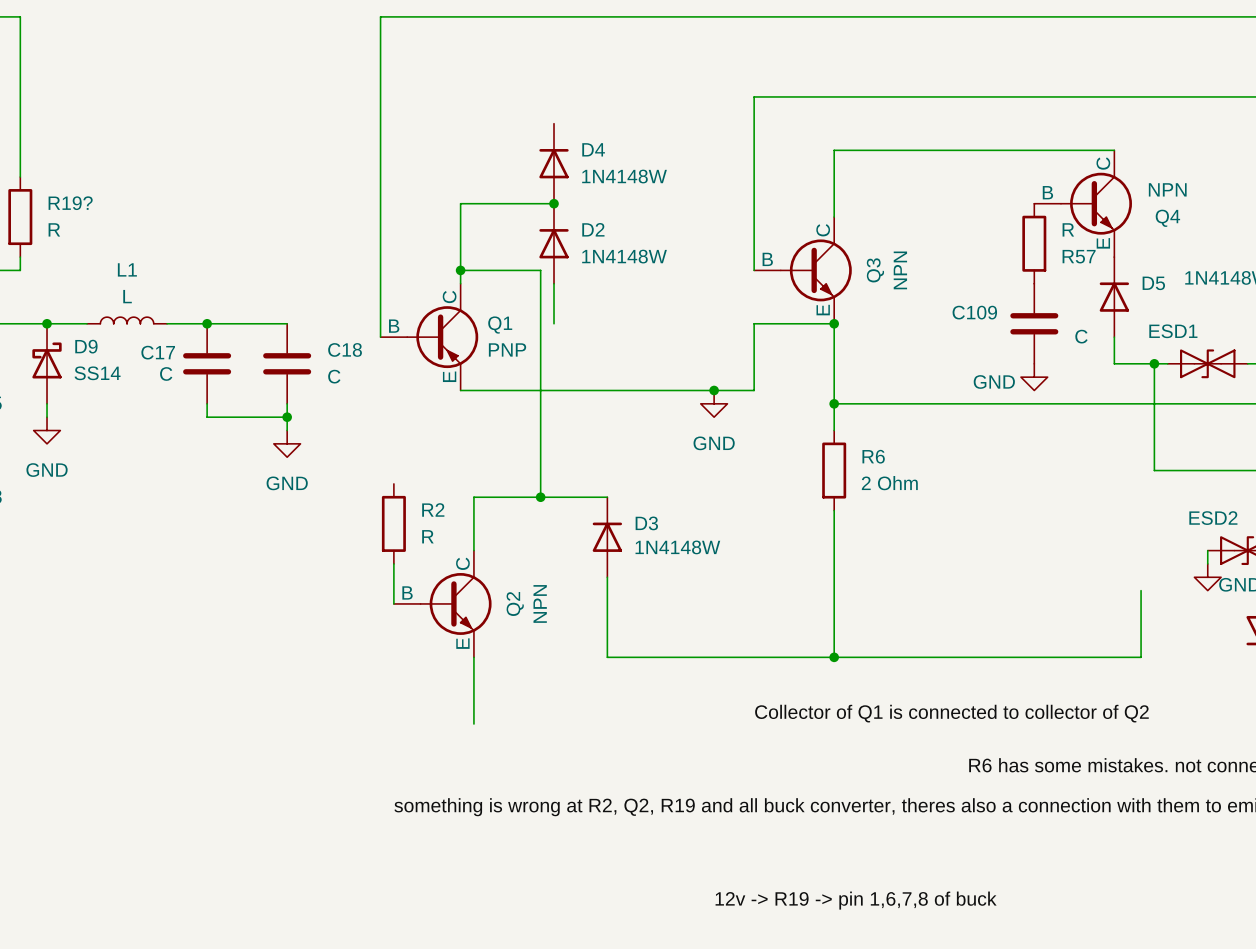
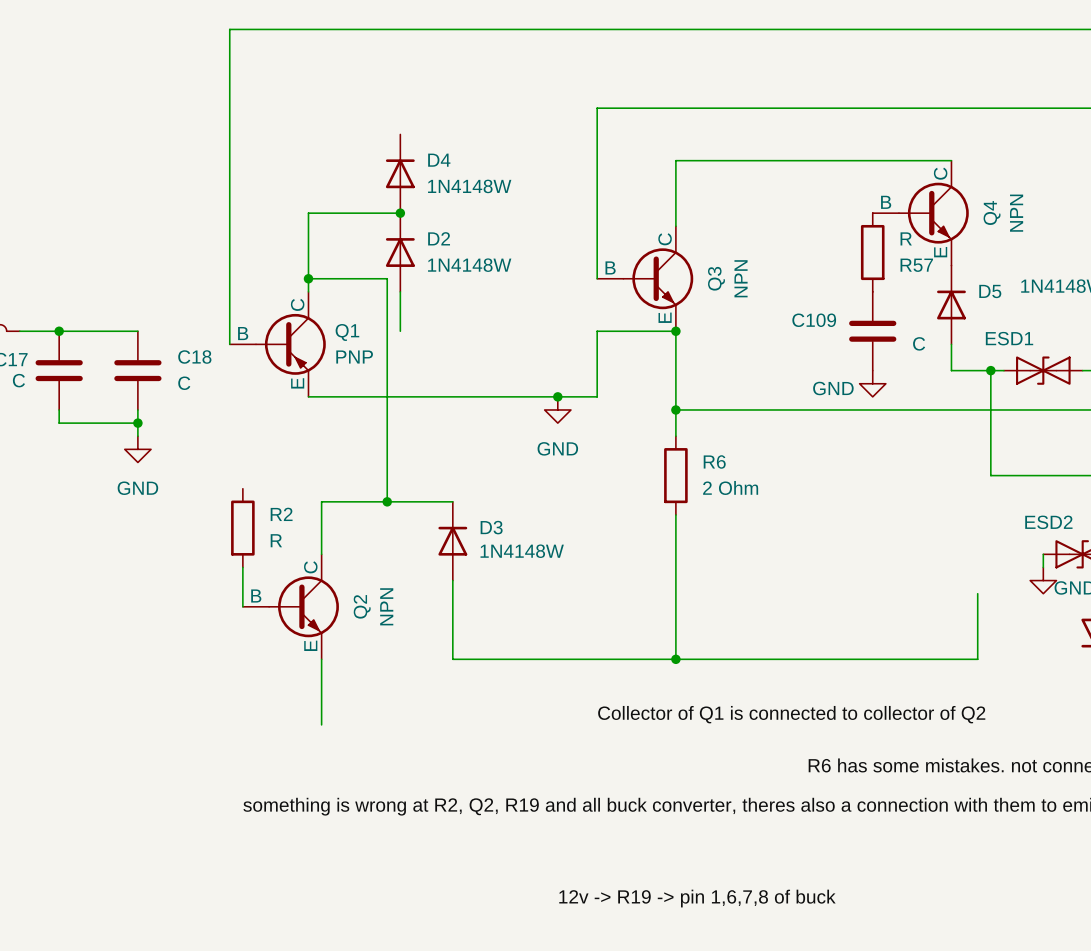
Q4 value rotation: 0° (1167, 189) -> 90° counterclockwise (1016, 213)
Q4 name rotation: 0° (1167, 218) -> 90° counterclockwise (992, 212)

